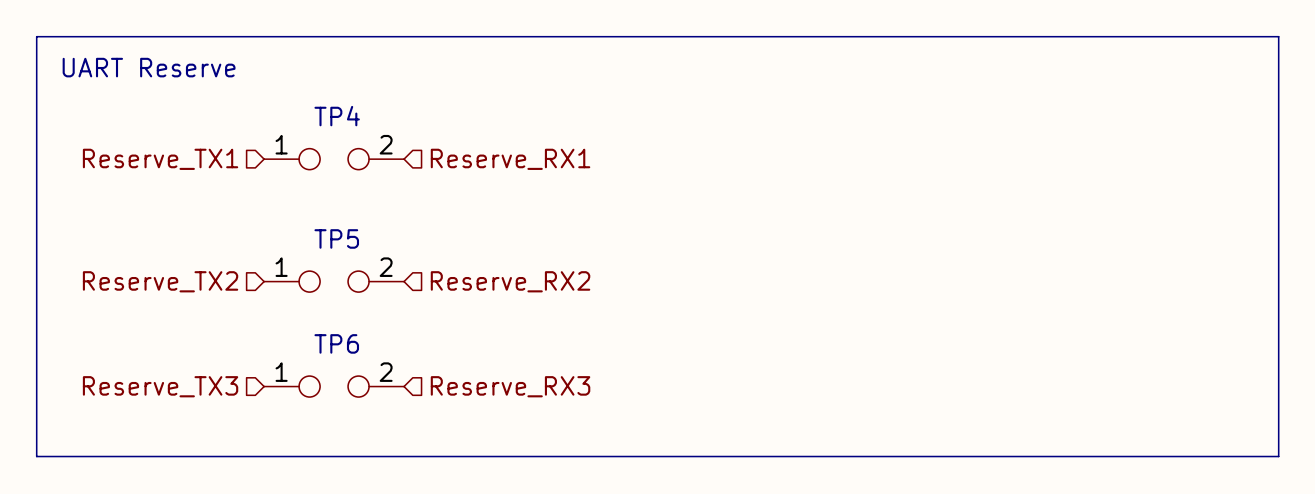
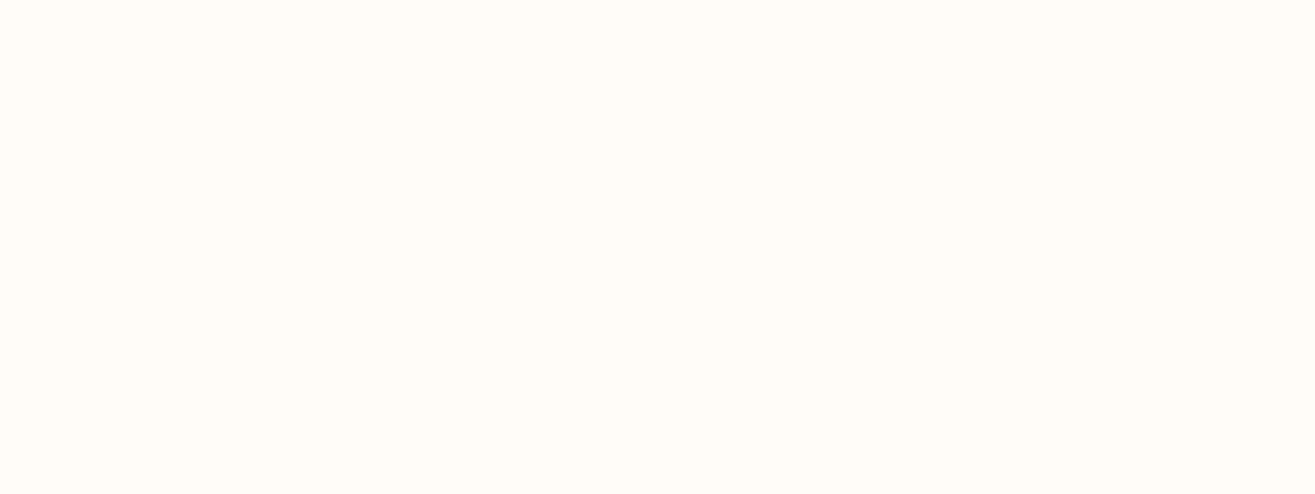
line: (36, 36) (1278, 36) (1278, 456) (36, 456) (36, 36) -> none
text: UART Reserve (149, 67) -> none
hierarchical label: Reserve_TX1 (160, 159) -> none
TP4: (334, 159) -> none
hierarchical label: Reserve_RX1 (510, 159) -> none
hierarchical label: Reserve_TX2 (160, 281) -> none
TP5: (334, 281) -> none
hierarchical label: Reserve_RX2 (510, 281) -> none
hierarchical label: Reserve_TX3 (160, 386) -> none
TP6: (334, 386) -> none
hierarchical label: Reserve_RX3 (510, 386) -> none

